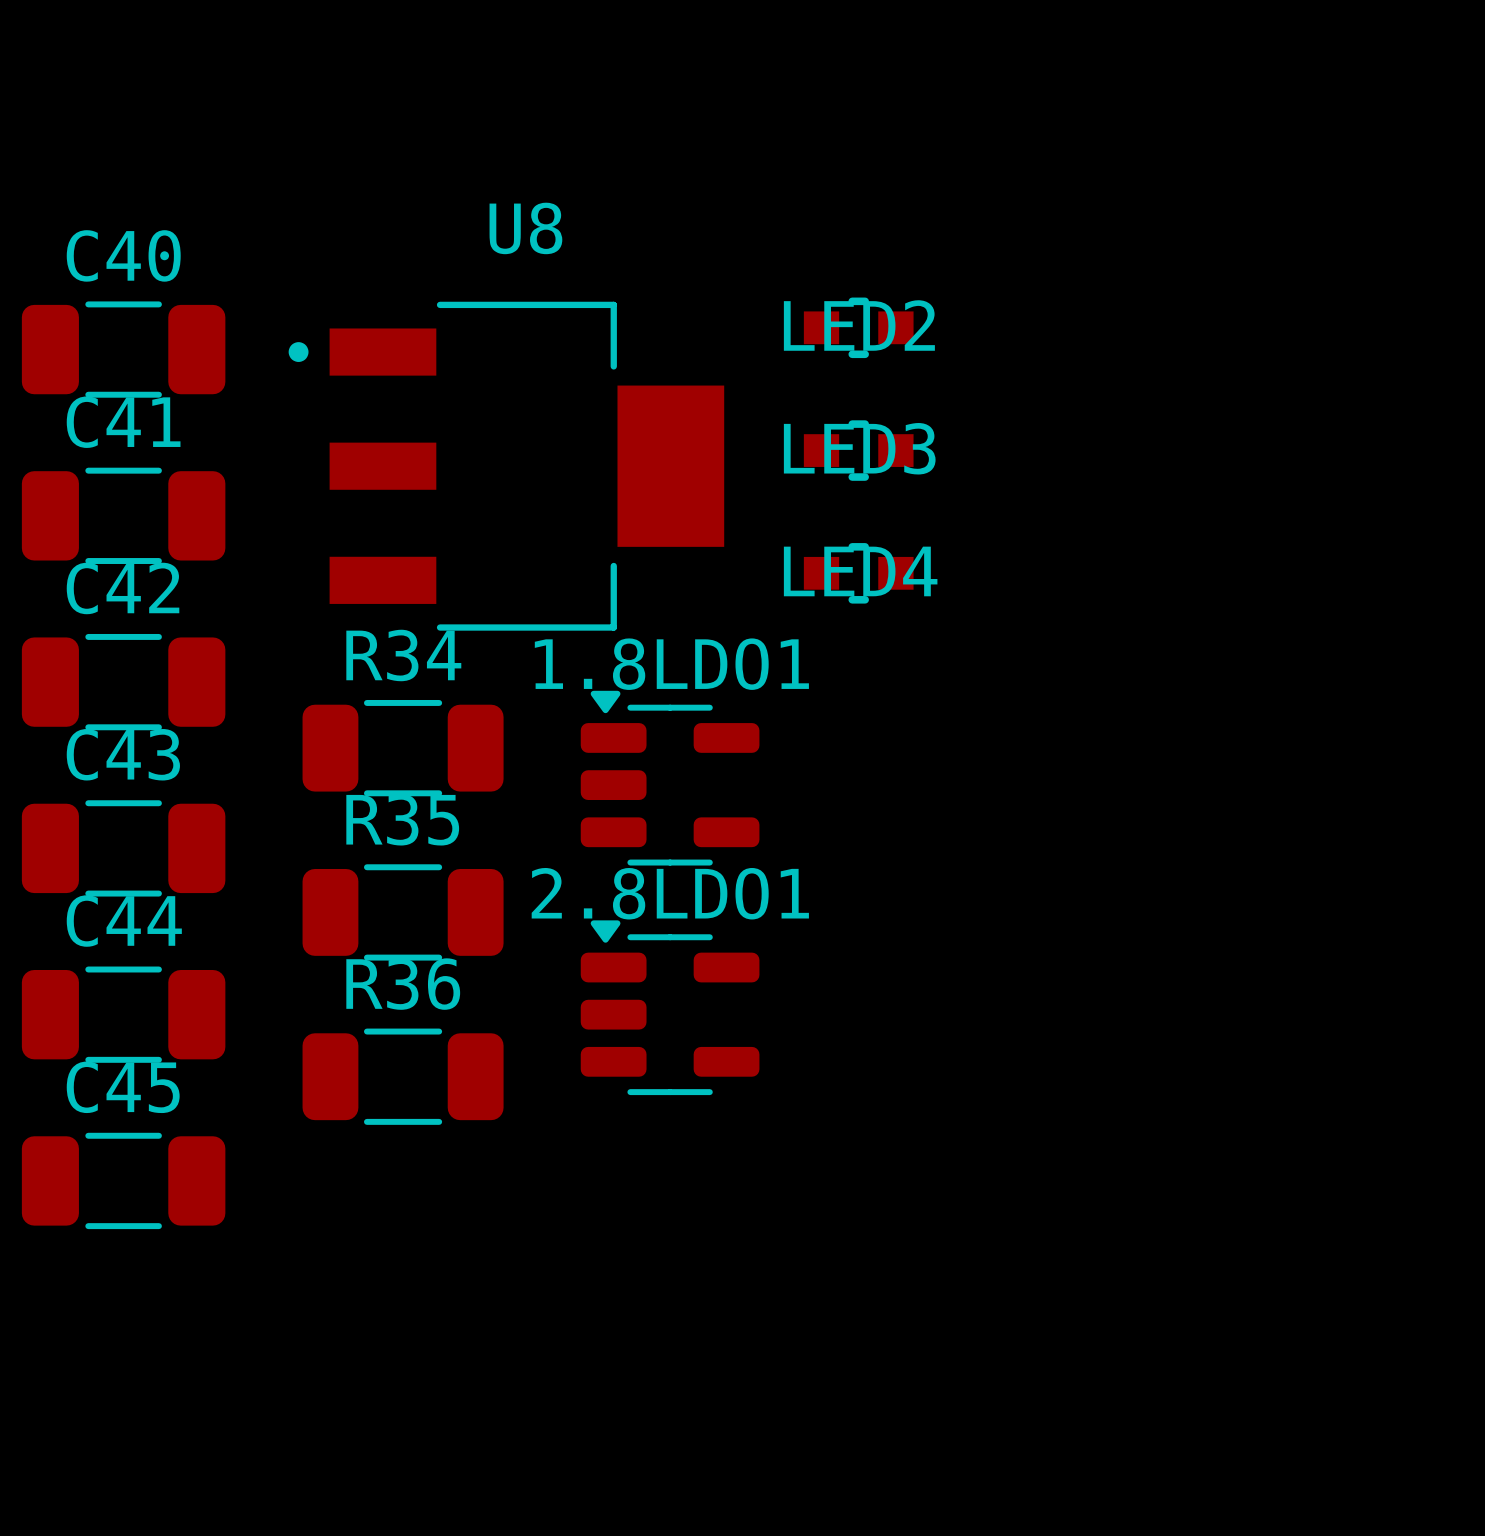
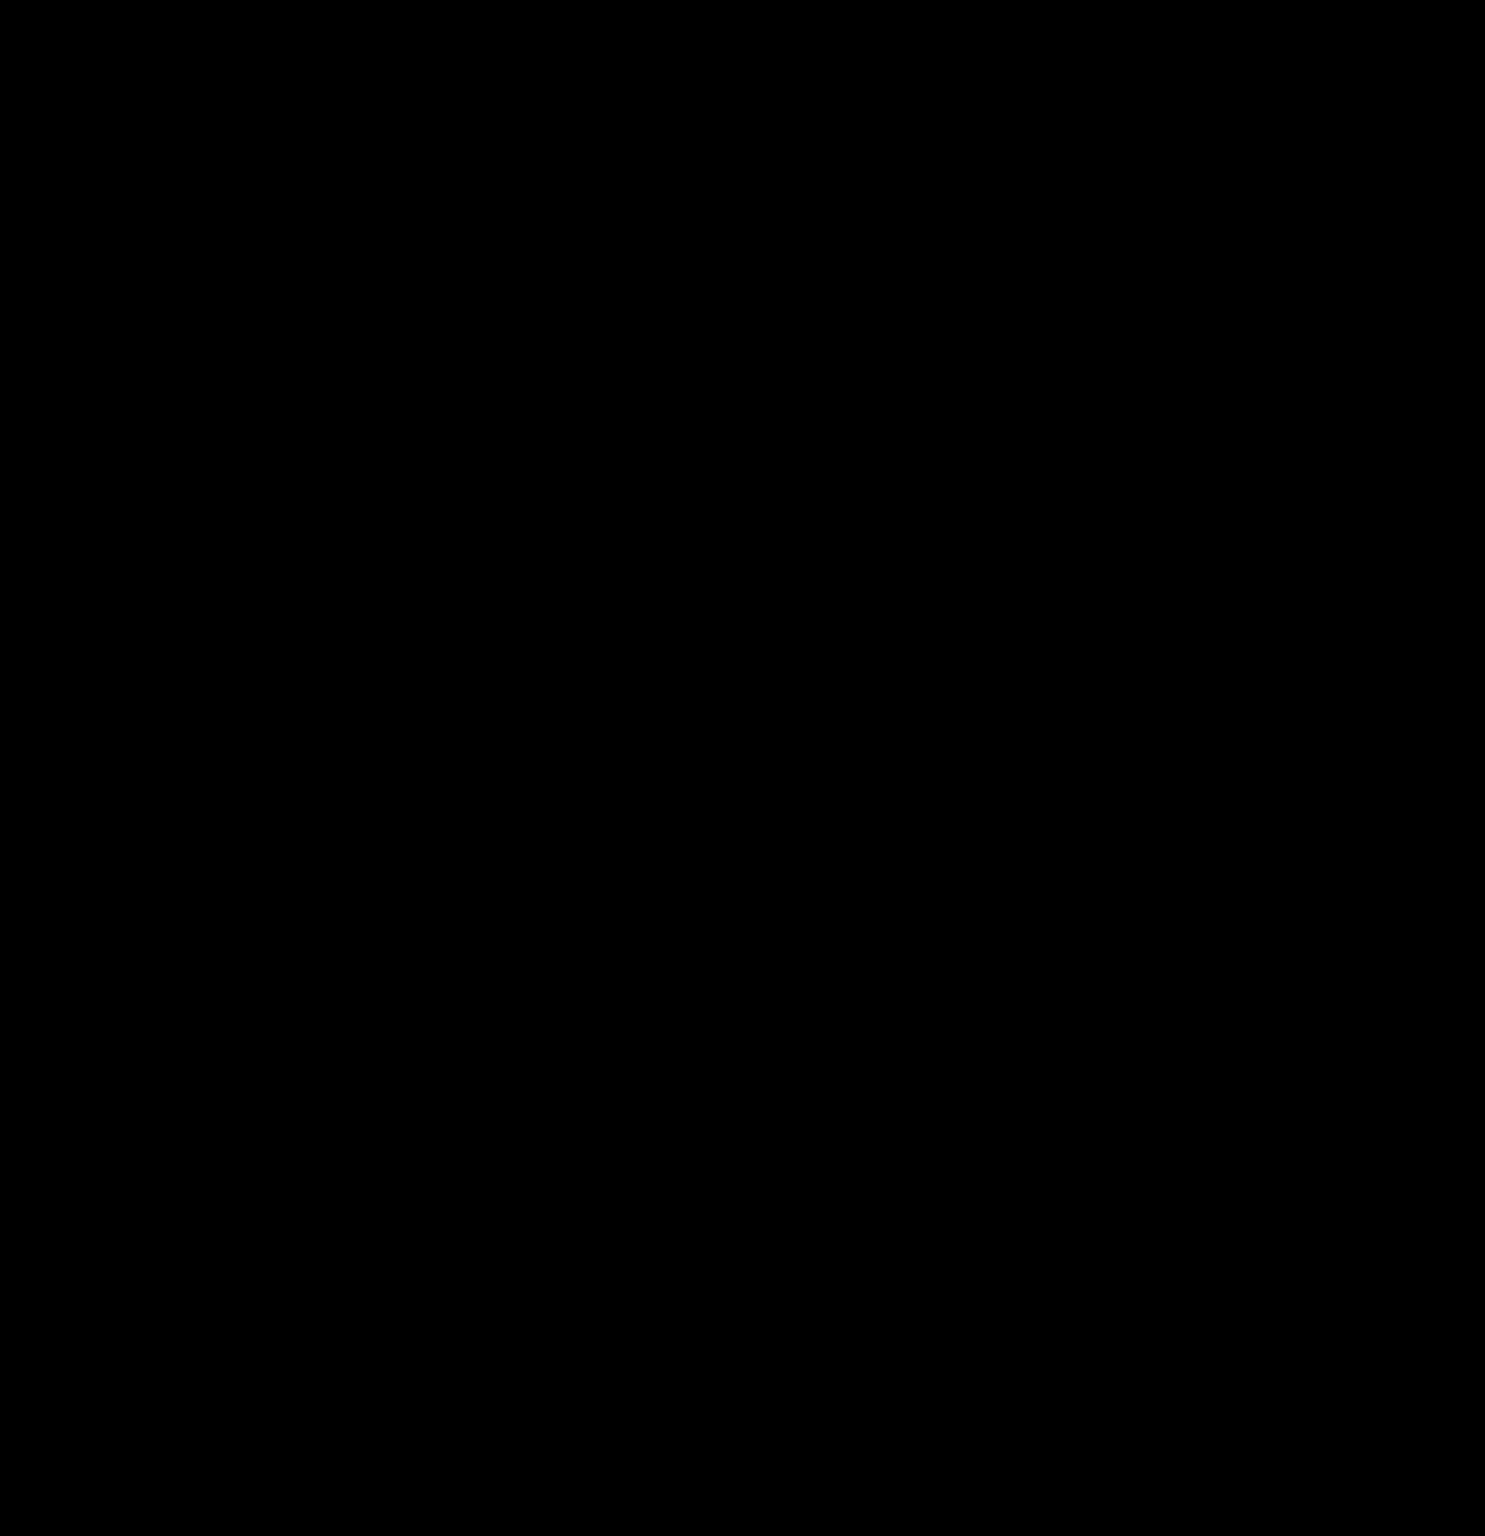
LED2: (858, 327) -> none
C40: (123, 349) -> none
LED3: (858, 450) -> none
U8: (506, 466) -> none
C41: (123, 515) -> none
LED4: (858, 573) -> none
C42: (123, 682) -> none
R34: (403, 748) -> none
1.8LDO1: (670, 778) -> none
C43: (123, 848) -> none
R35: (403, 912) -> none
2.8LDO1: (670, 1007) -> none
C44: (123, 1014) -> none
R36: (403, 1076) -> none
C45: (123, 1180) -> none

